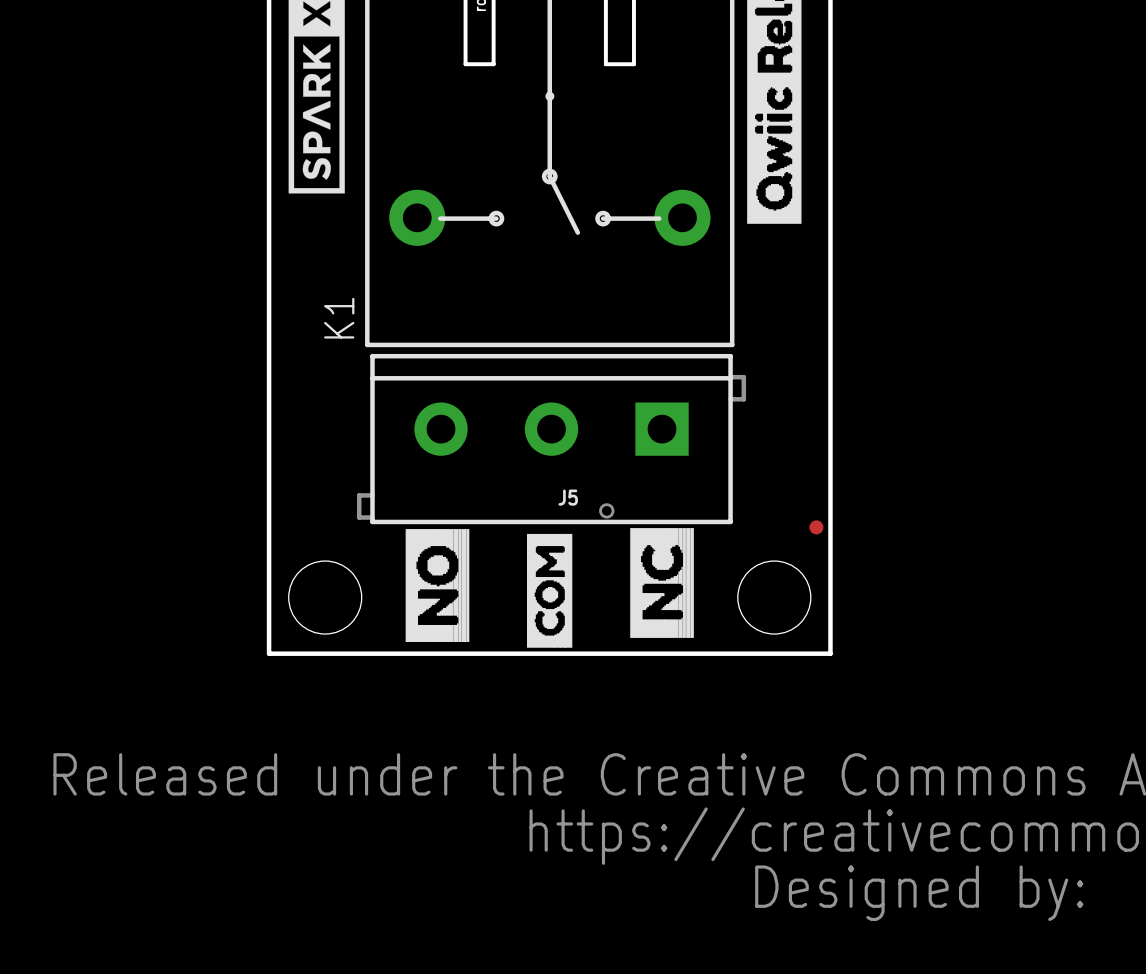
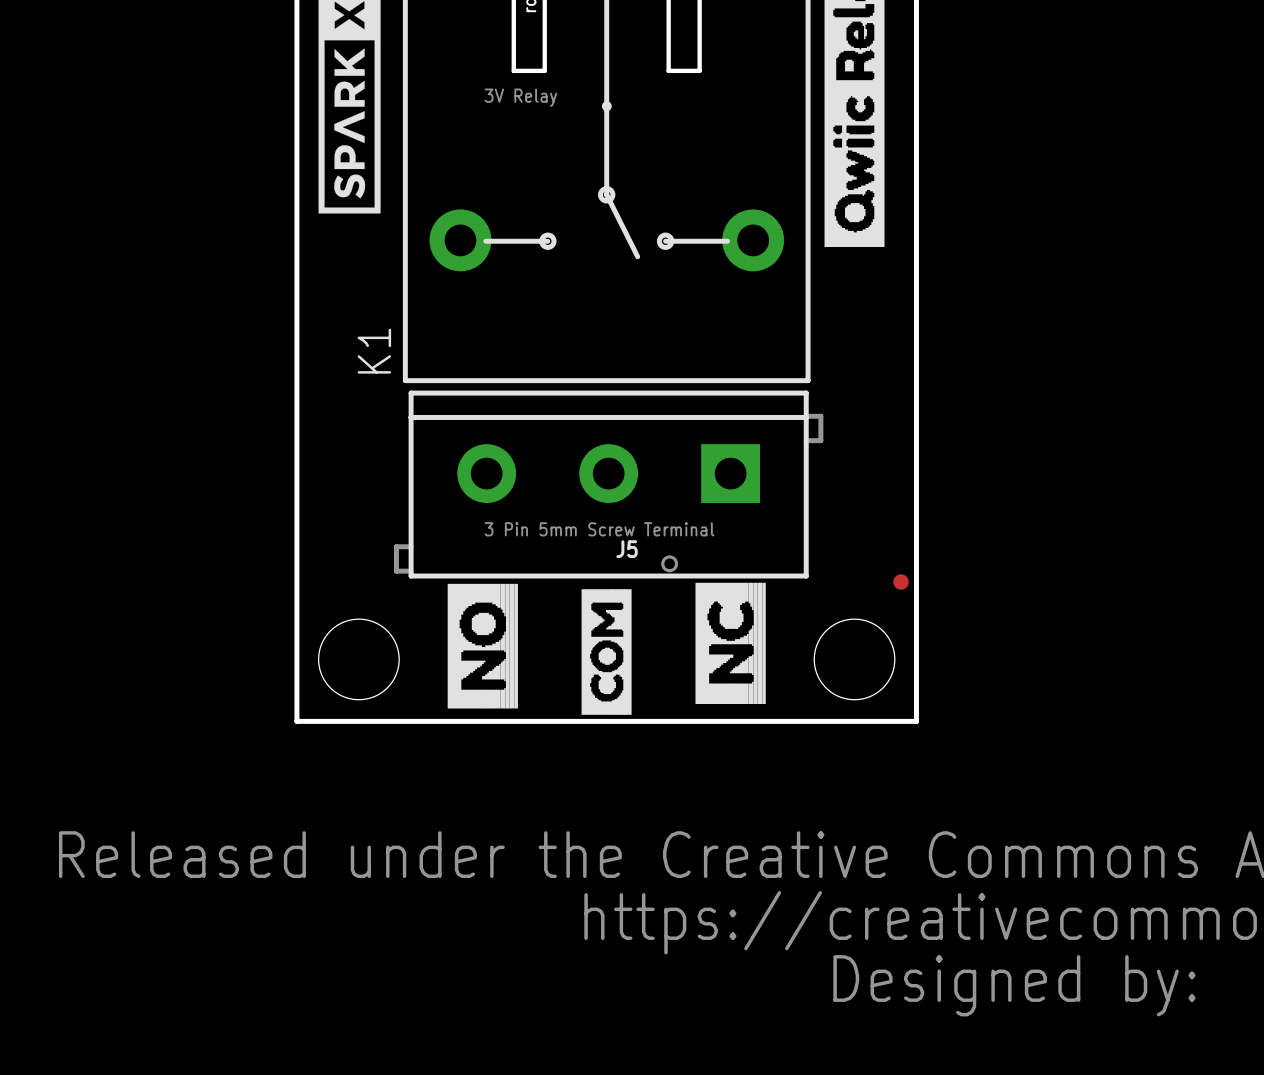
text: none -> 3V Relay (520, 97)
text: none -> 3 Pin 5mm Screw Terminal (599, 529)

